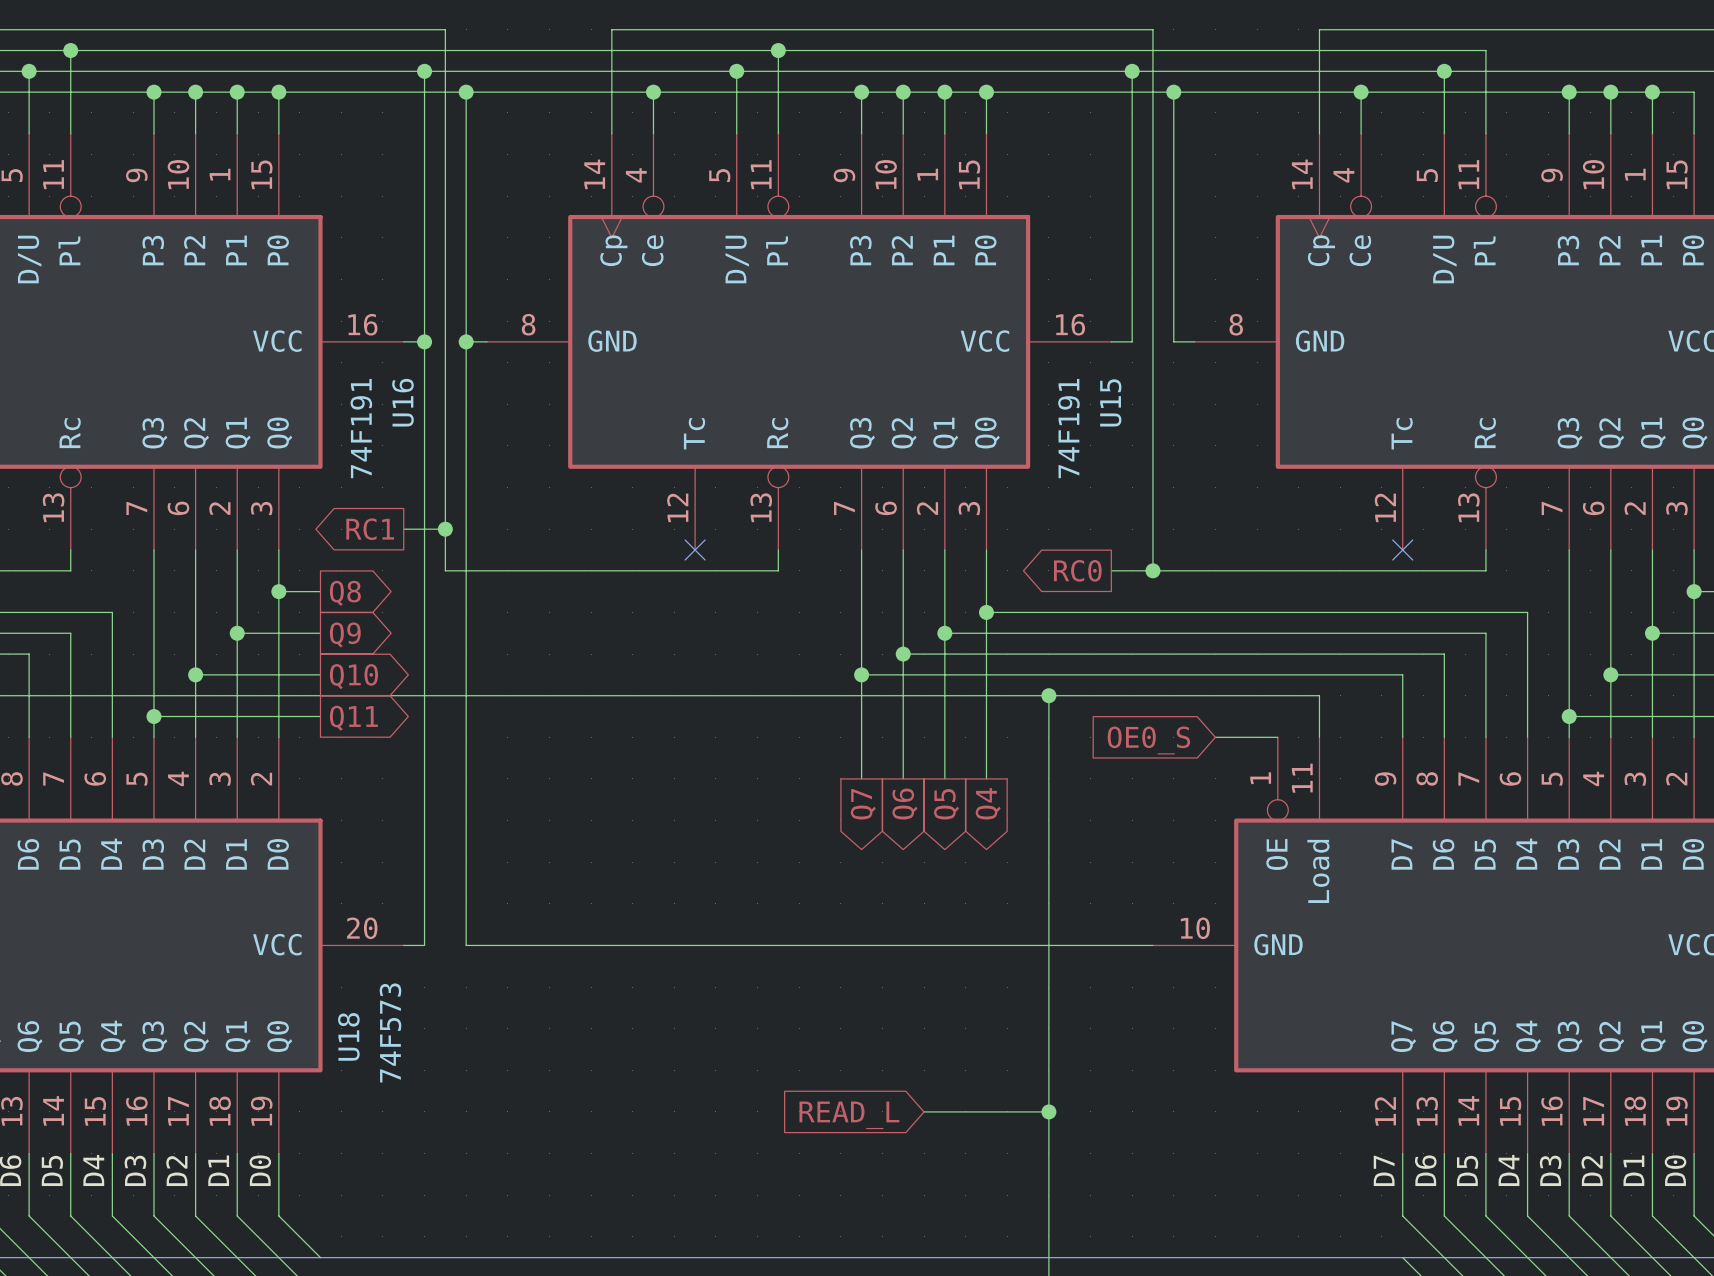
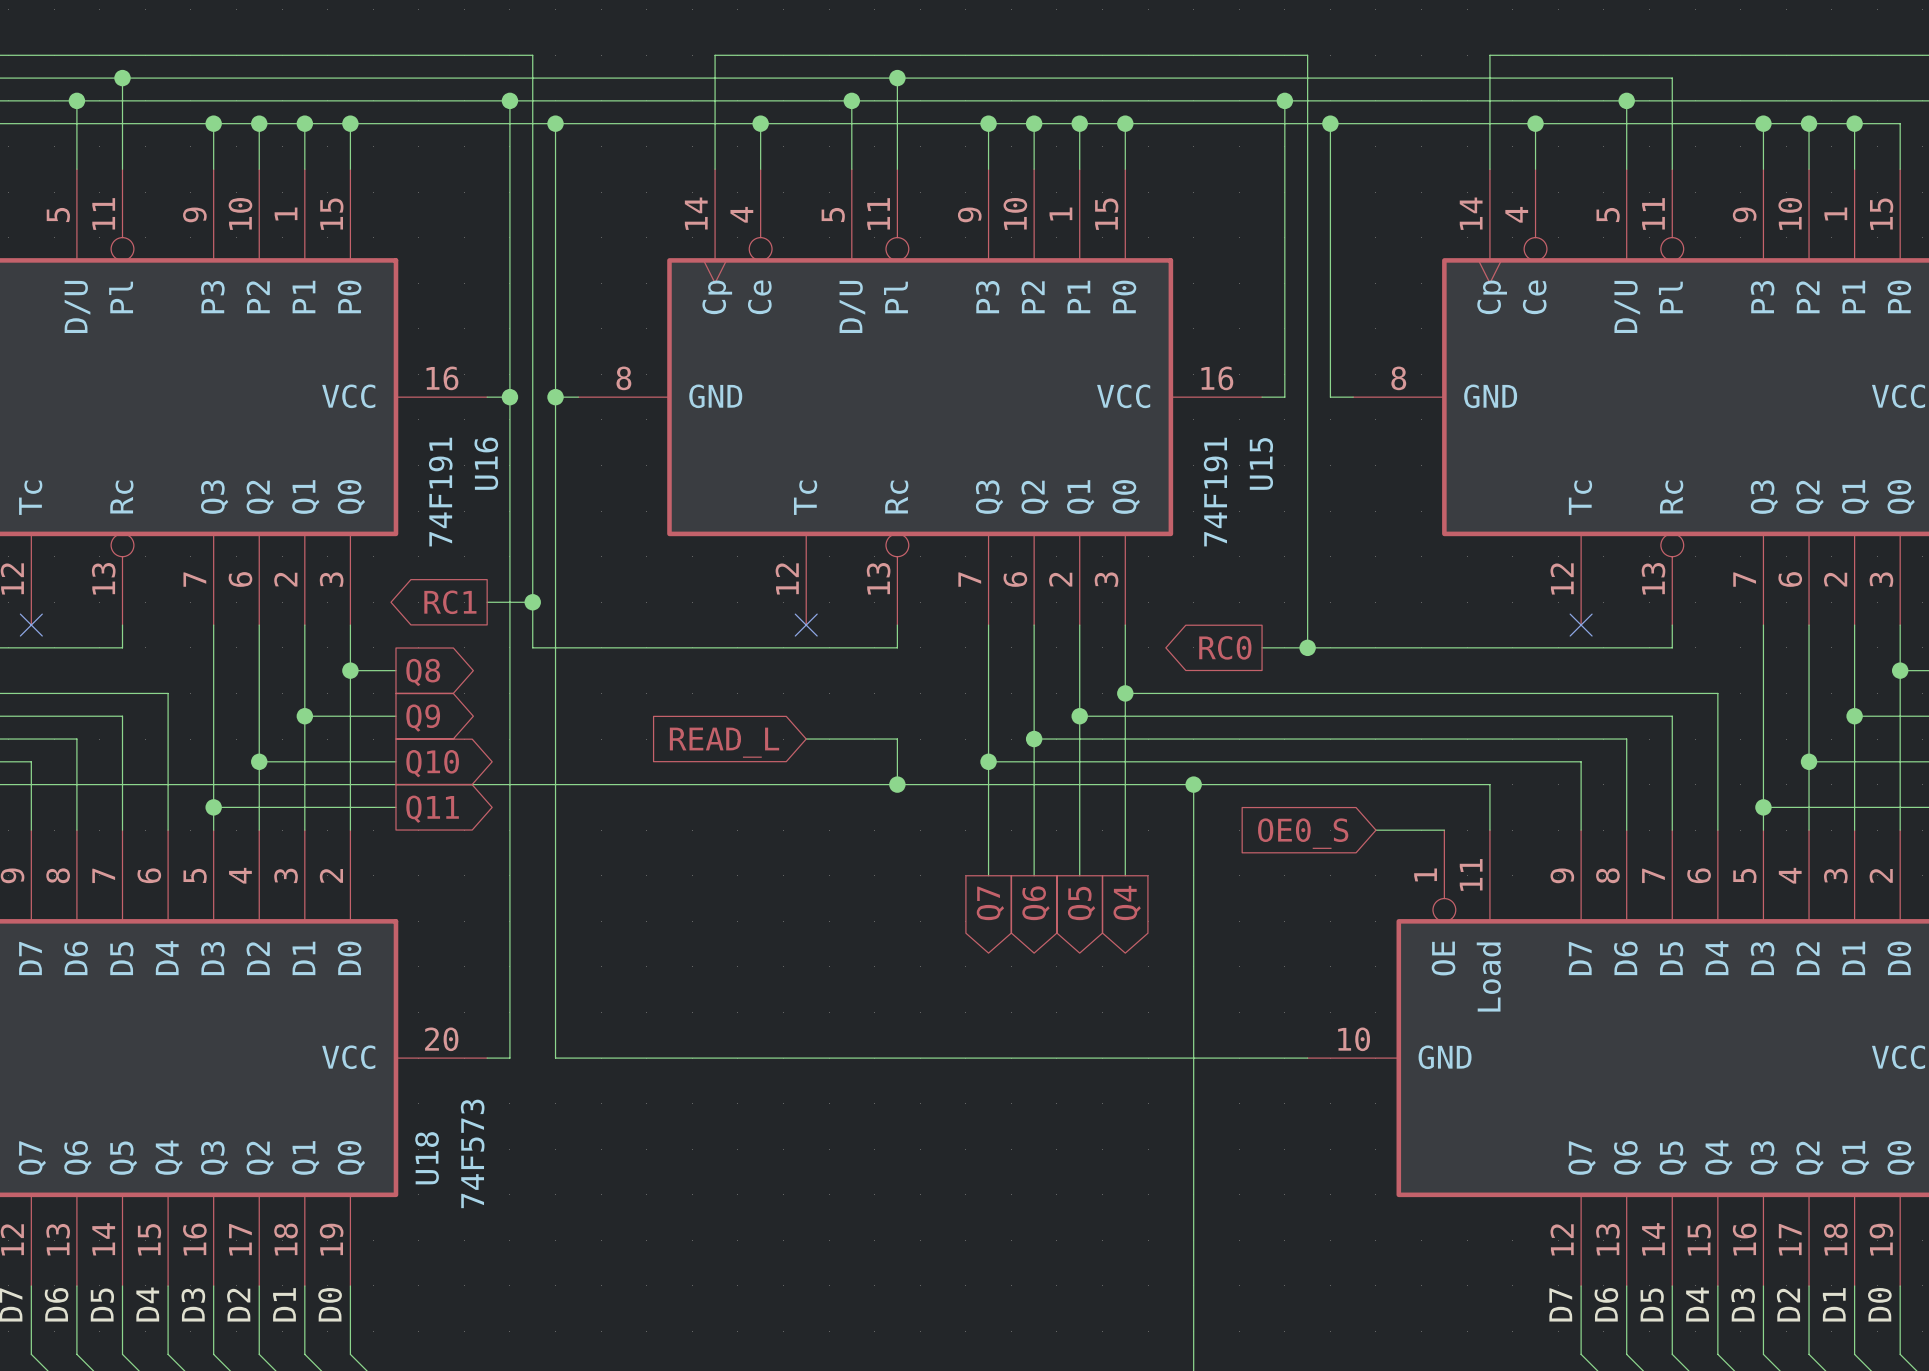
wire: none -> (806, 739) (897, 739) (897, 784)
global label: none -> READ_L (724, 742)
junction: none -> (897, 784)
wire: (924, 1111) (1048, 1111) -> none
junction: (1048, 1111) -> none
global label: READ_L (849, 1115) -> none

